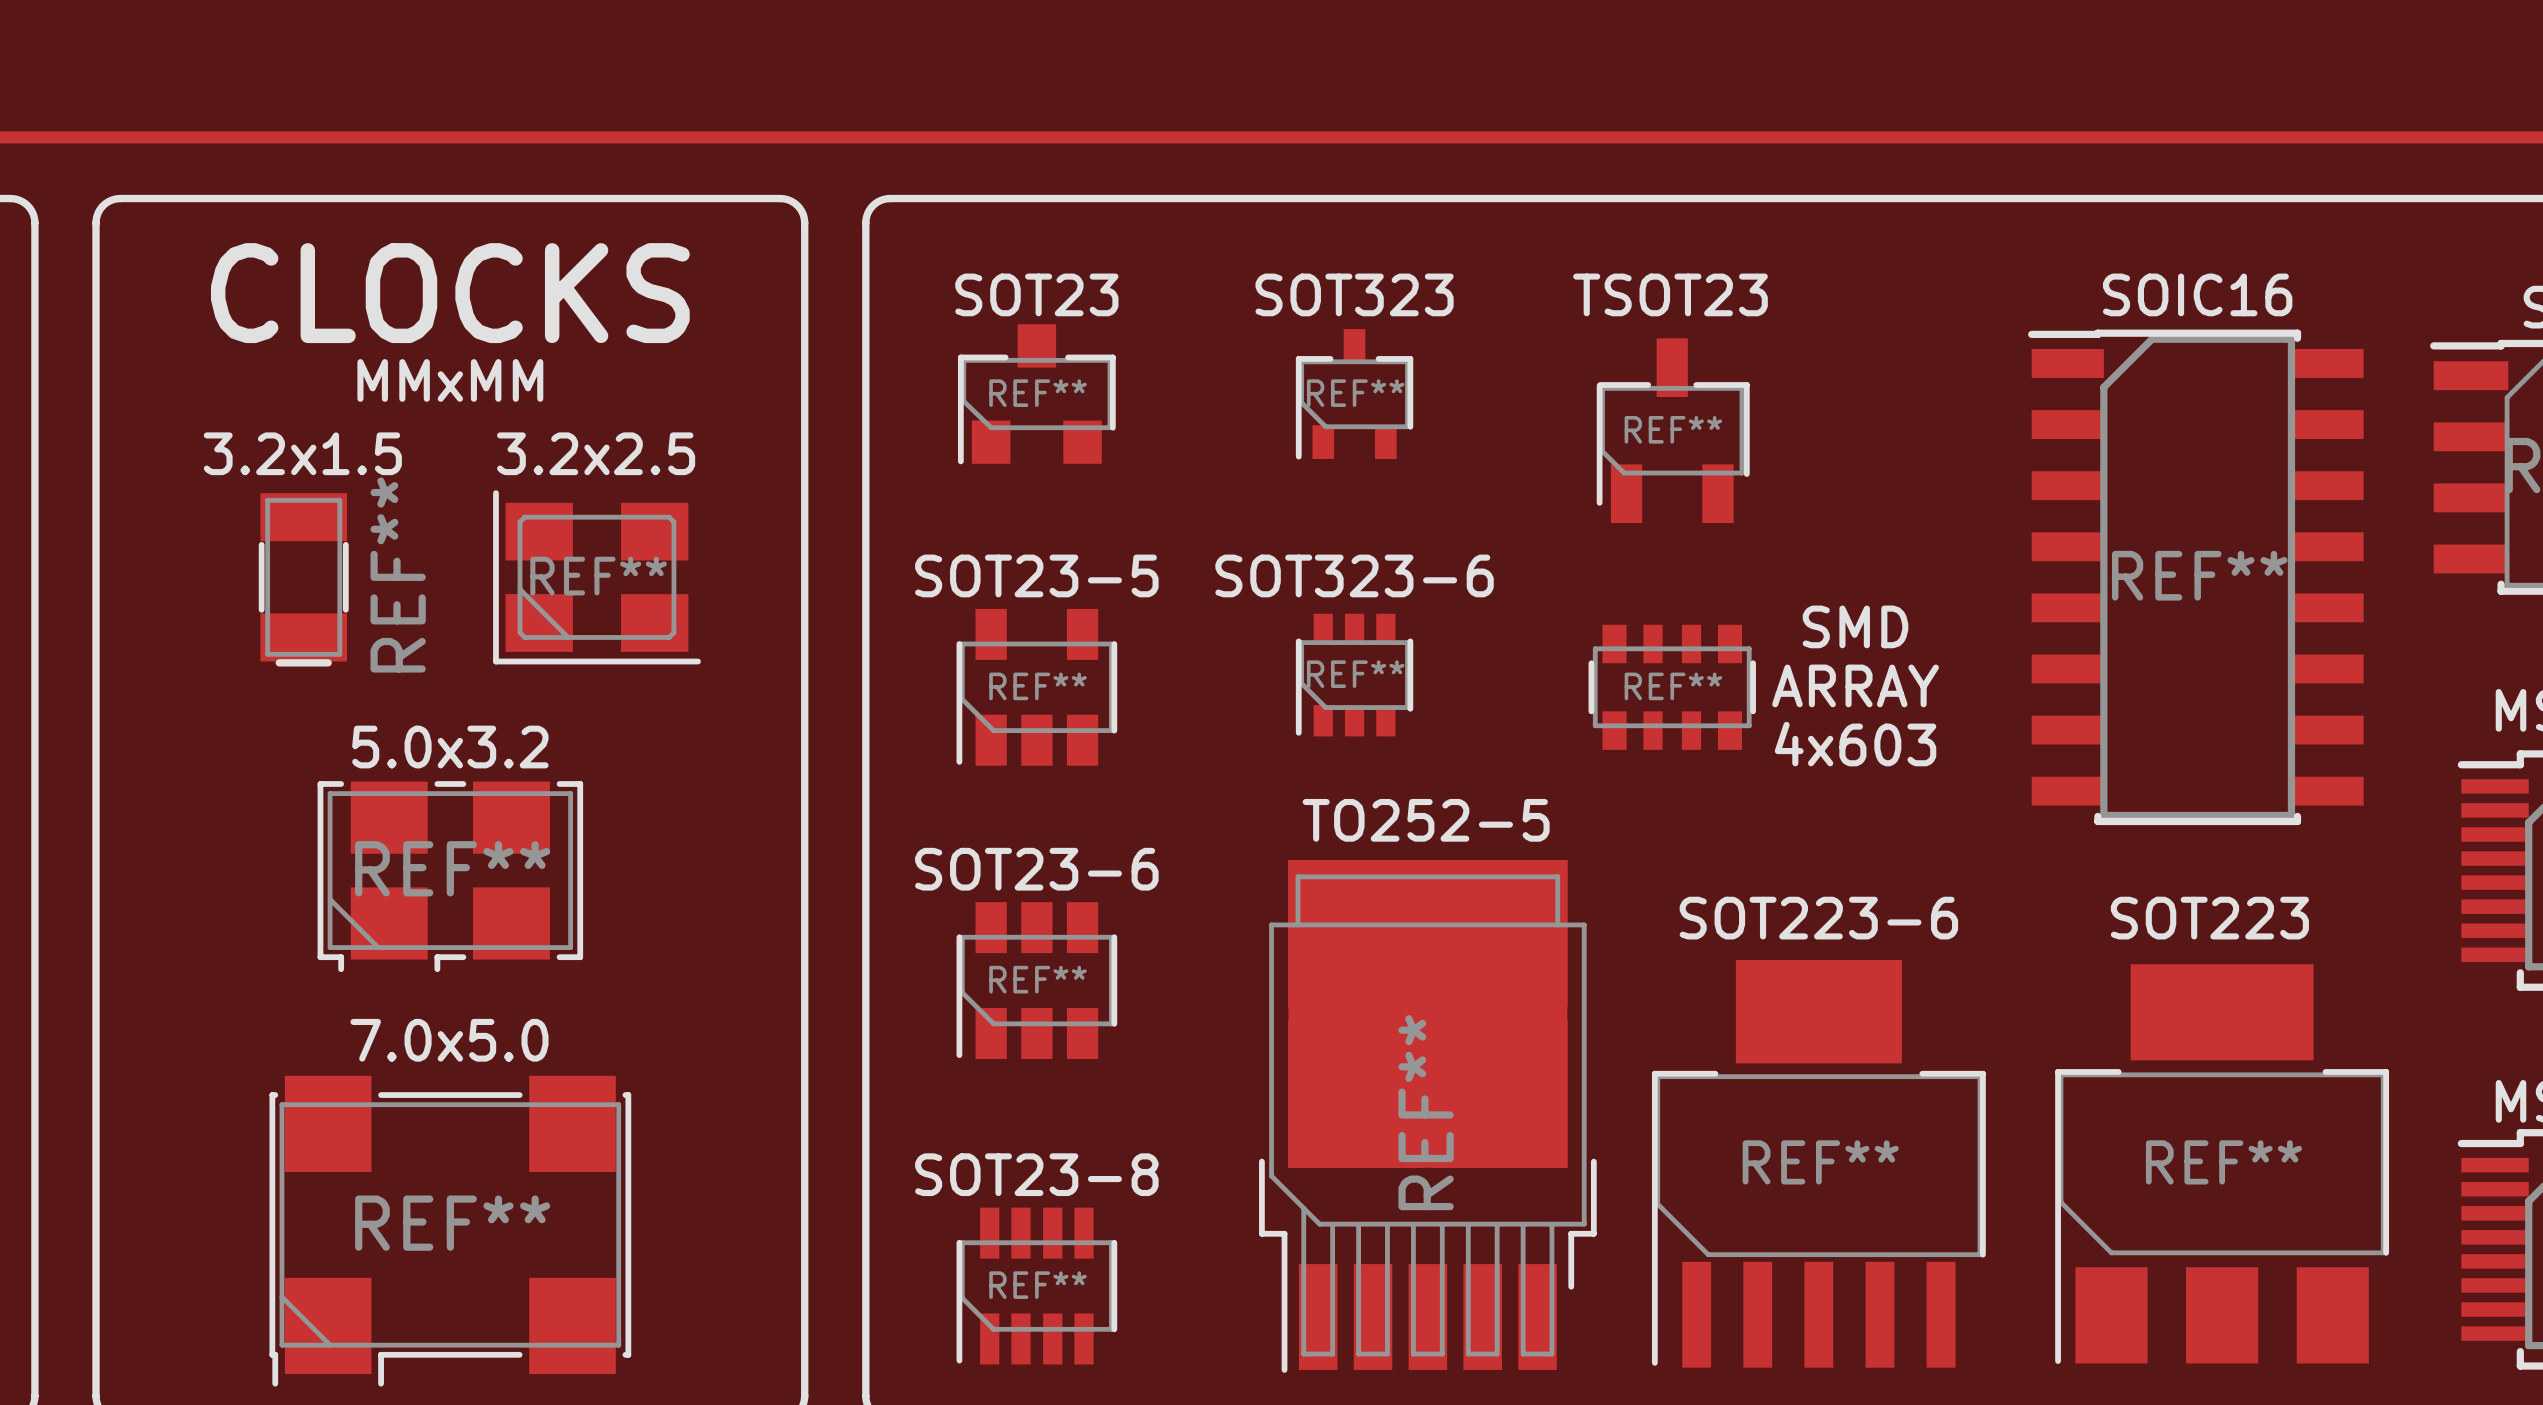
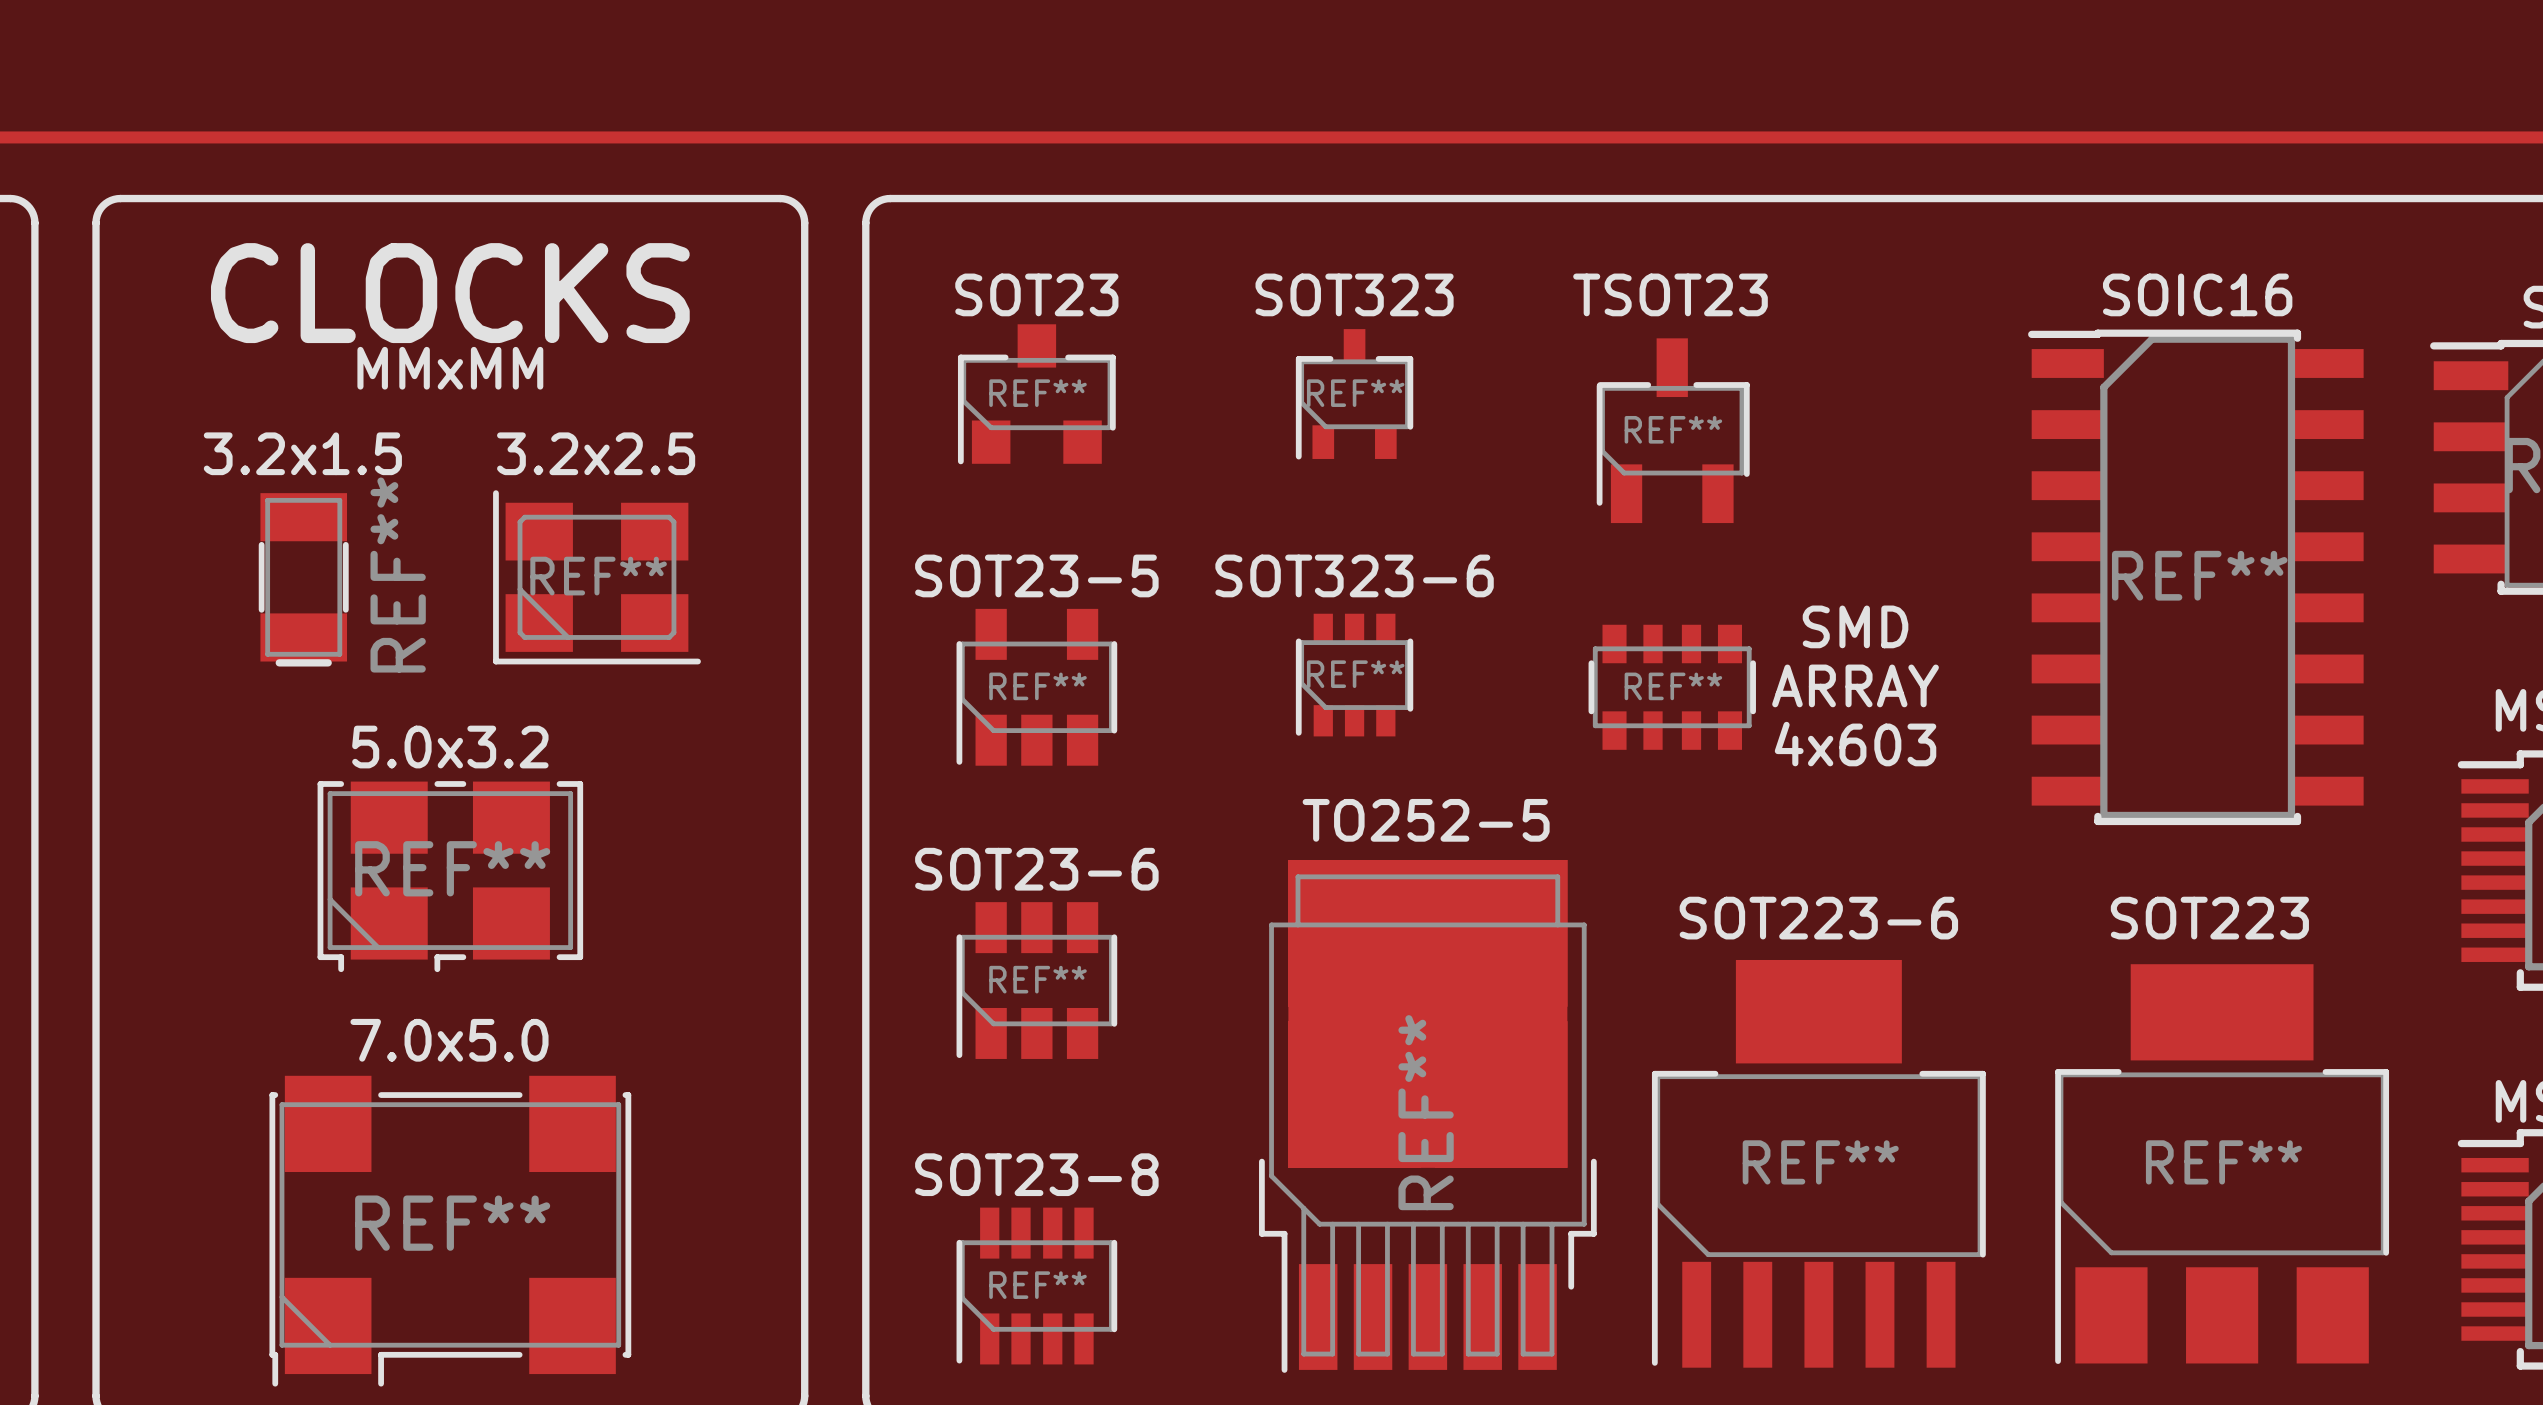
text position: MMxMM (450, 380) -> MMxMM (450, 368)

